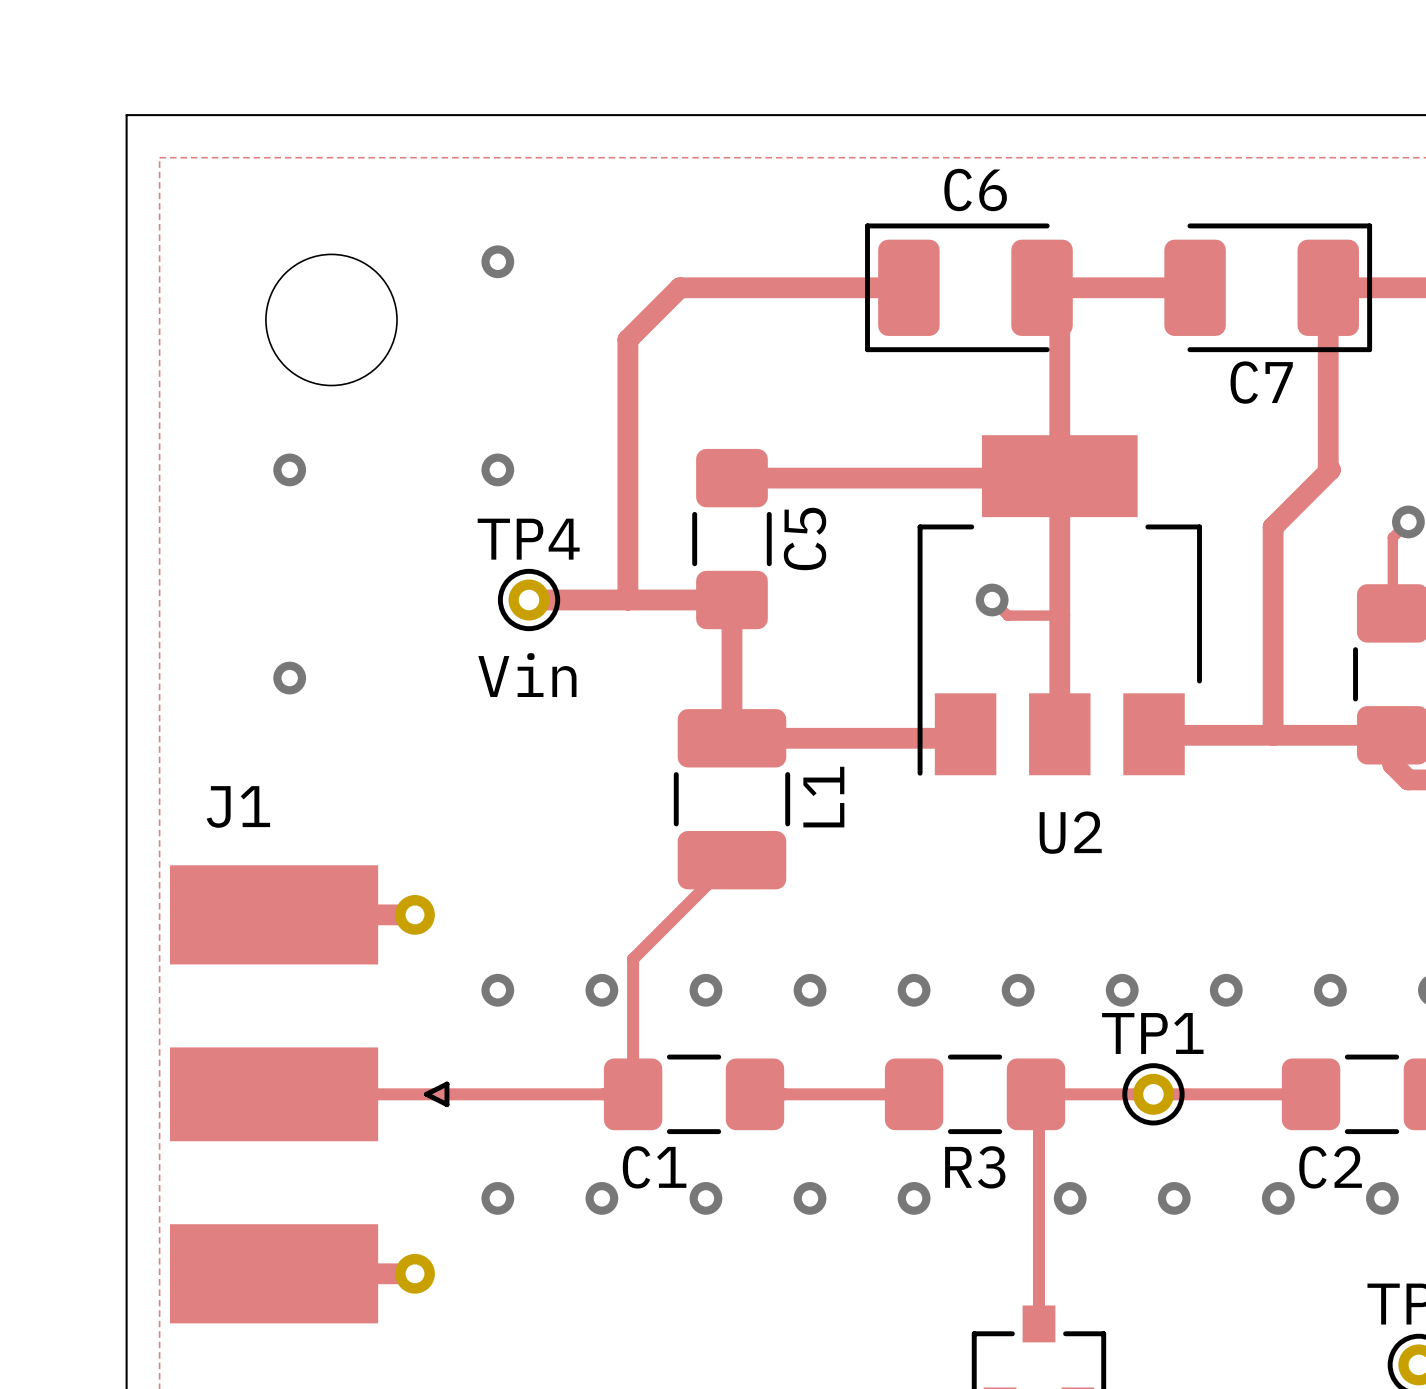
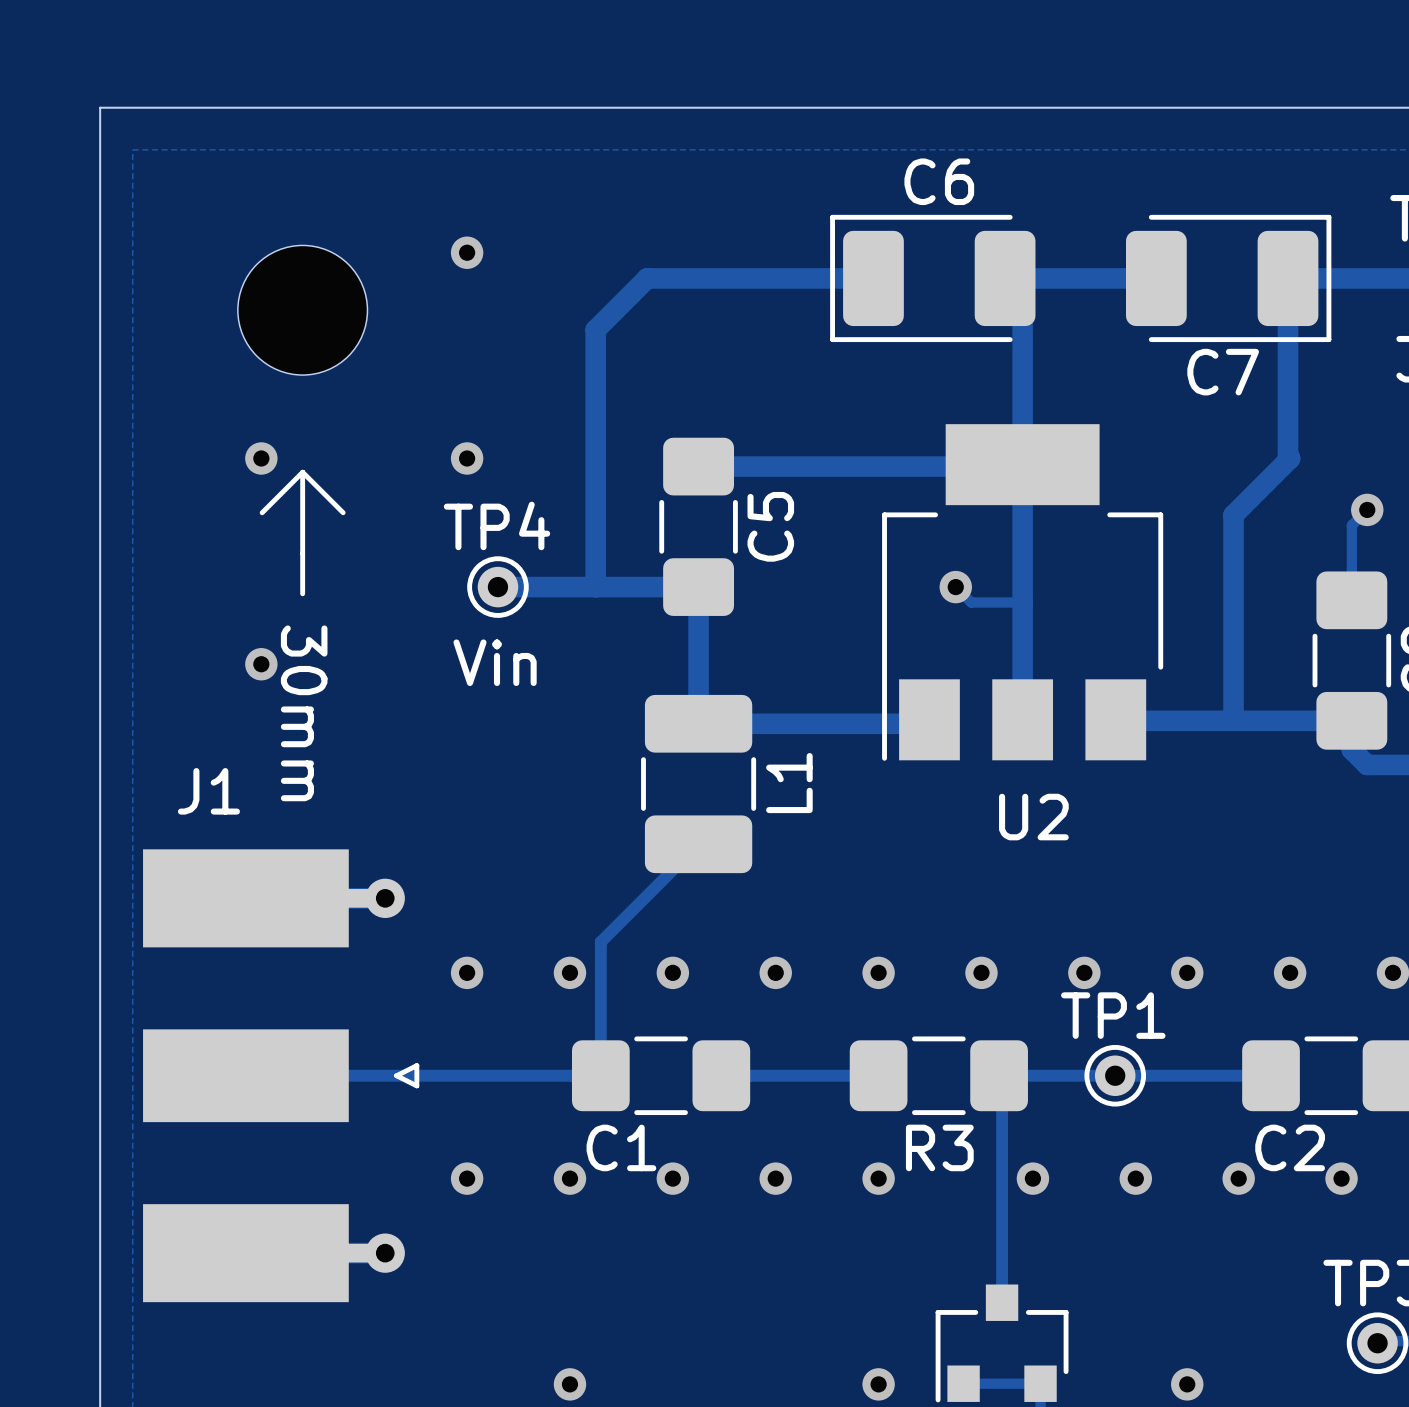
line: none -> (302, 472) (302, 593)
line: none -> (302, 472) (262, 512)
line: none -> (302, 472) (343, 512)
text: none -> 30mm (304, 713)

